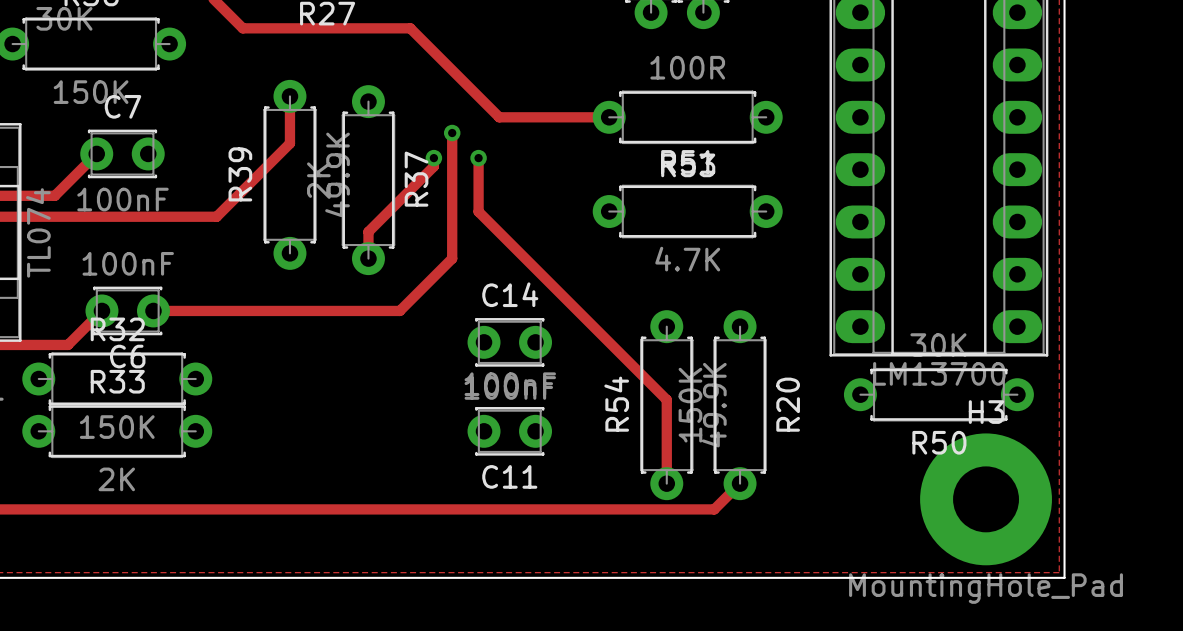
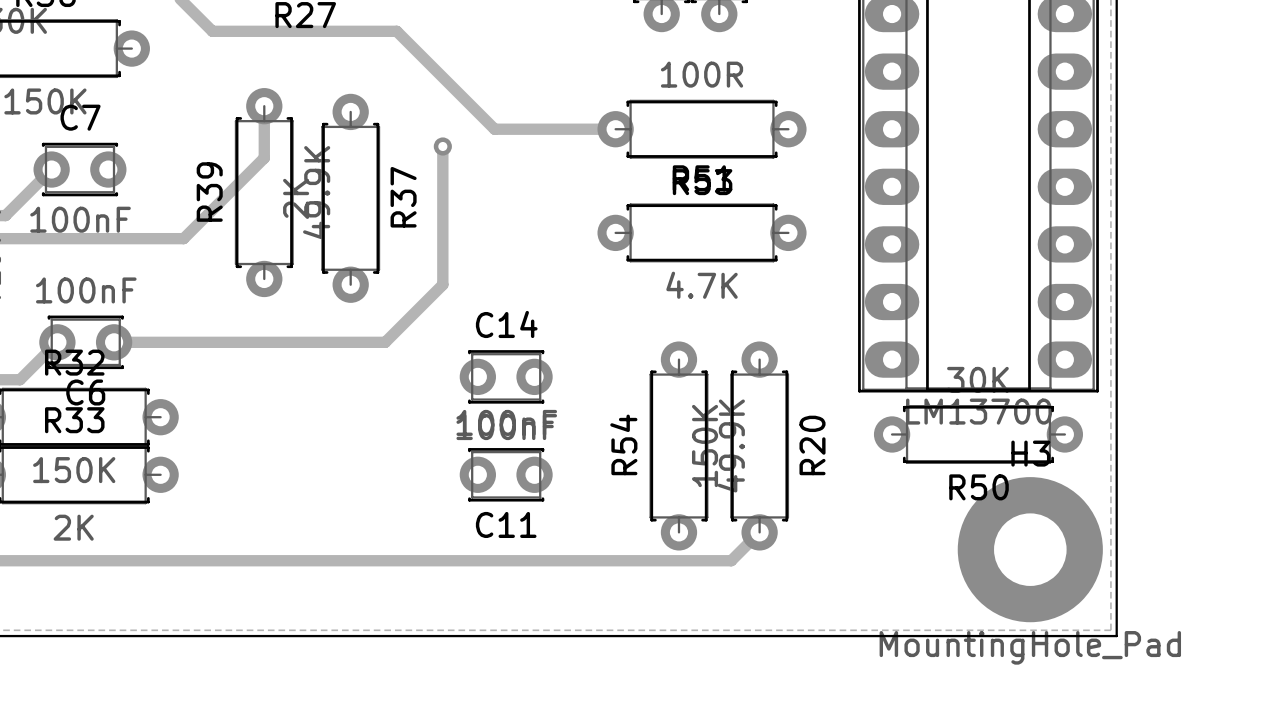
track: (433, 158) (433, 166) (368, 231) (368, 258) -> none
via: (433, 158) -> none
track: (478, 158) (478, 211) (666, 399) (666, 483) -> none
via: (478, 158) -> none

